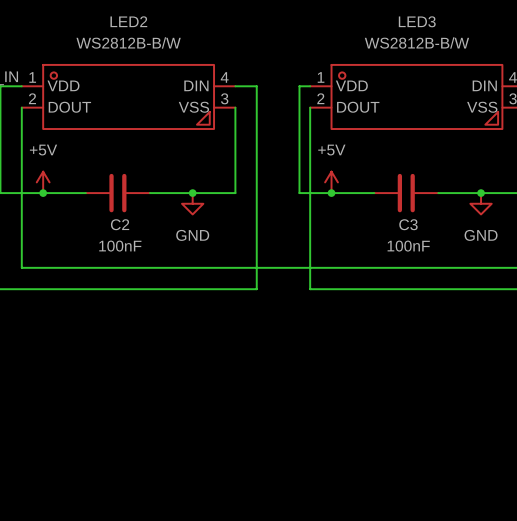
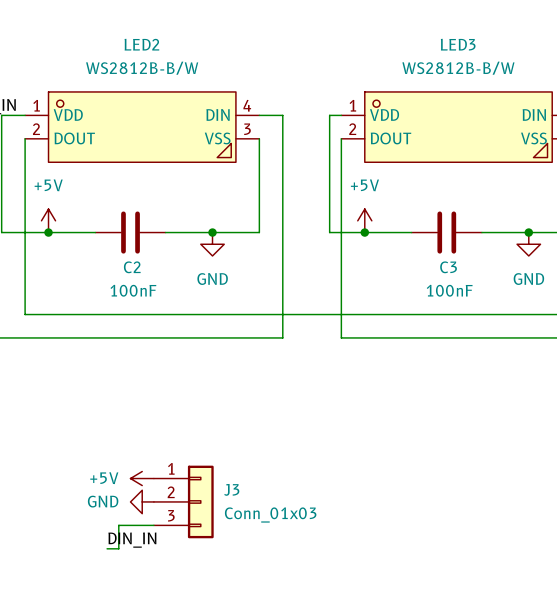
power symbol: none -> +5V (142, 478)
power symbol: none -> GND (142, 501)
J3: none -> Conn_01x03 (183, 501)
wire: none -> (153, 525) (118, 525) (118, 548) (107, 548)
label: none -> DIN_IN (132, 540)

